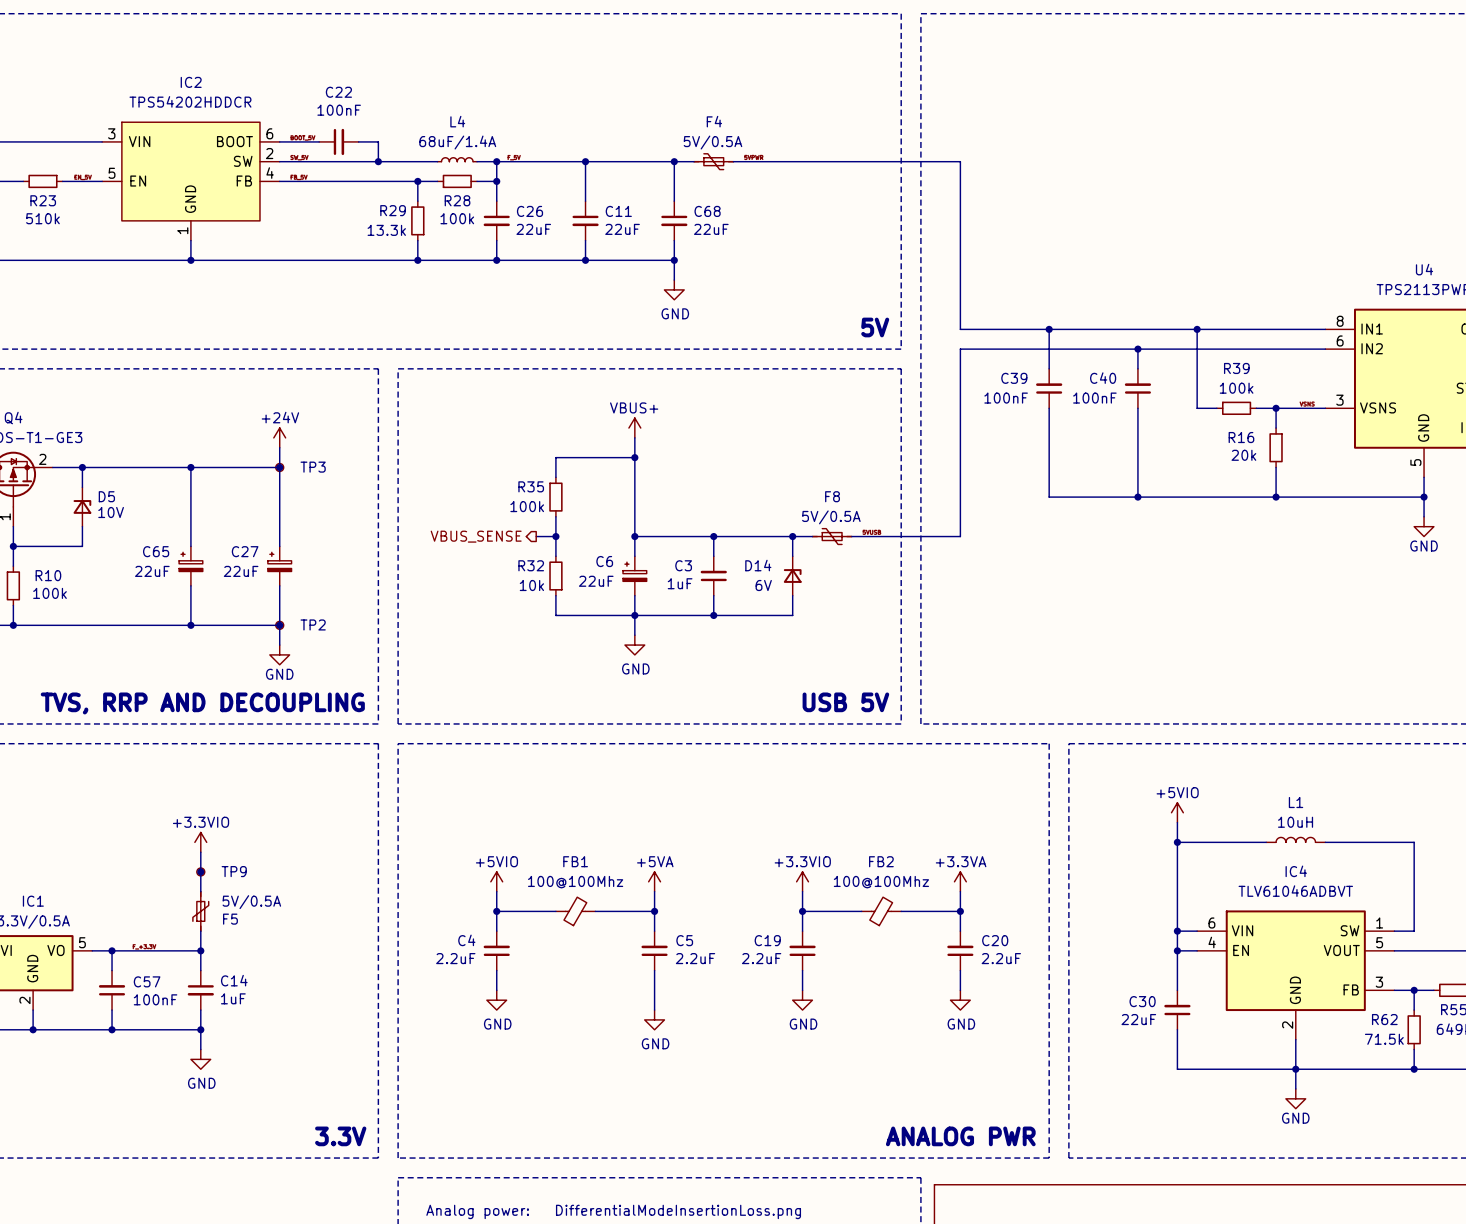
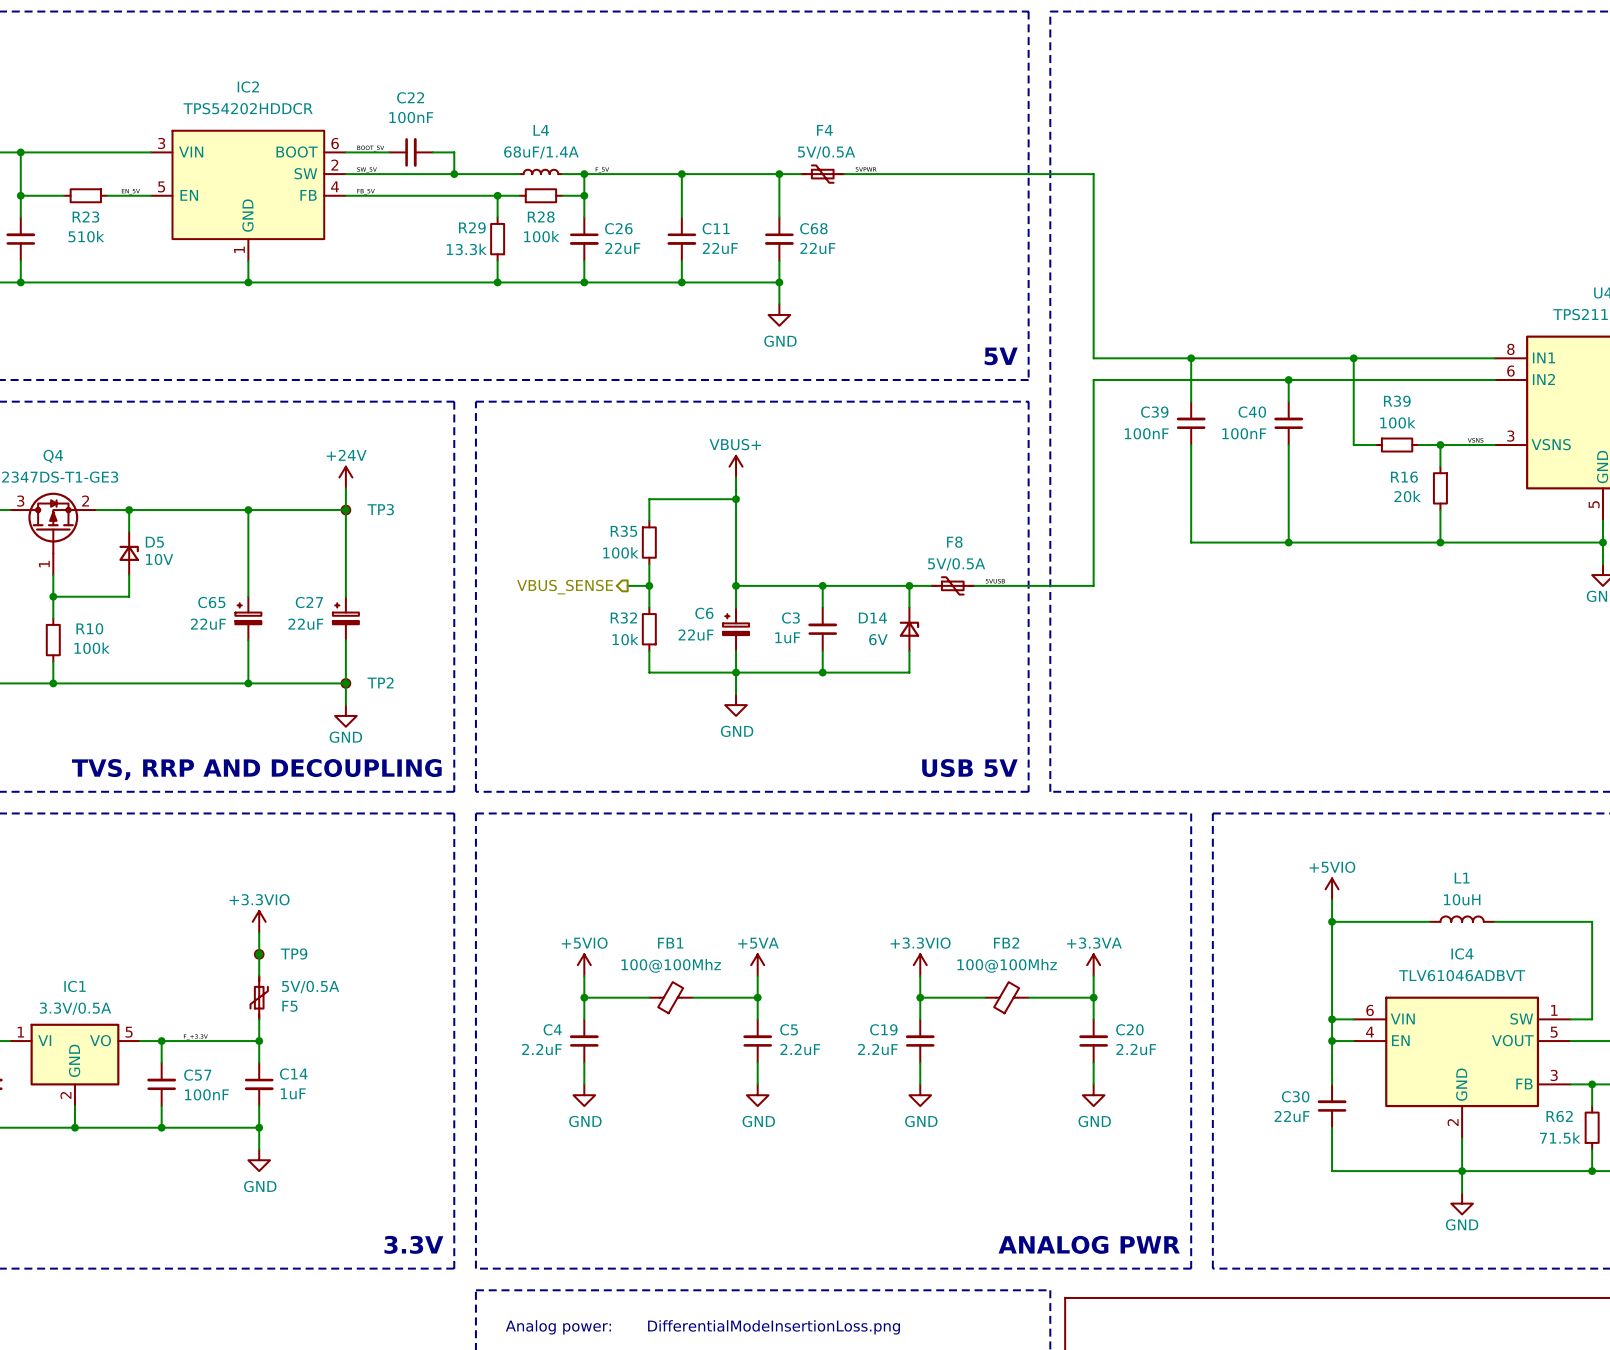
power symbol position: GND (654, 1019) -> GND (757, 1095)

